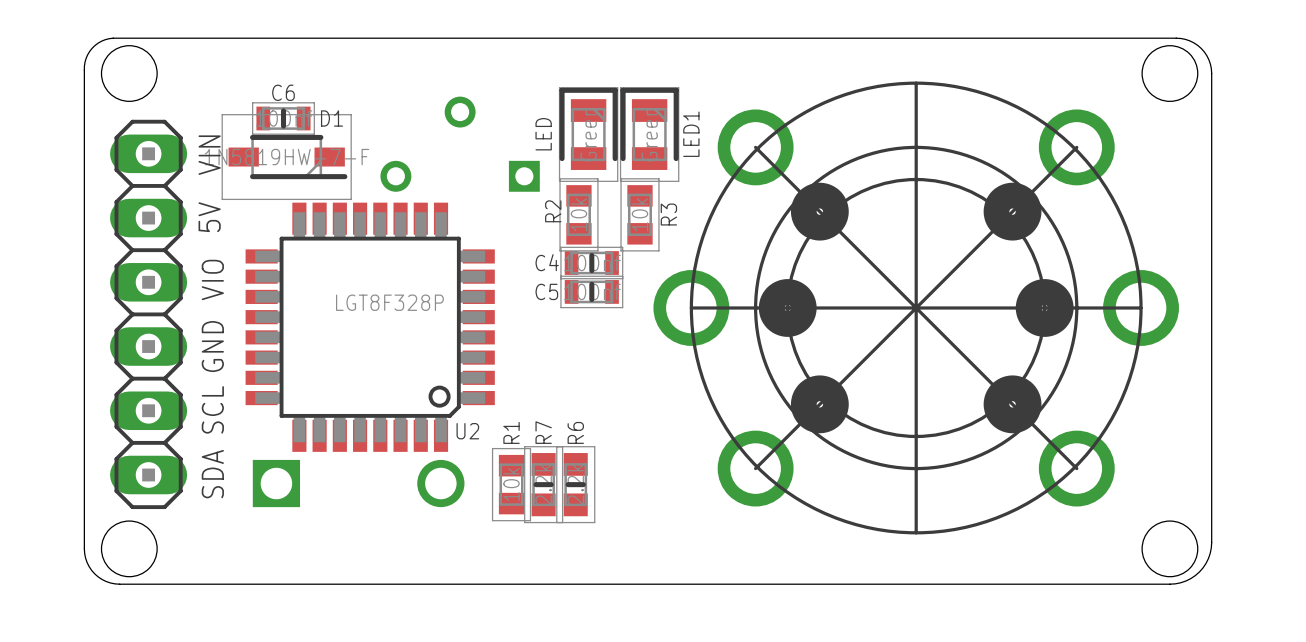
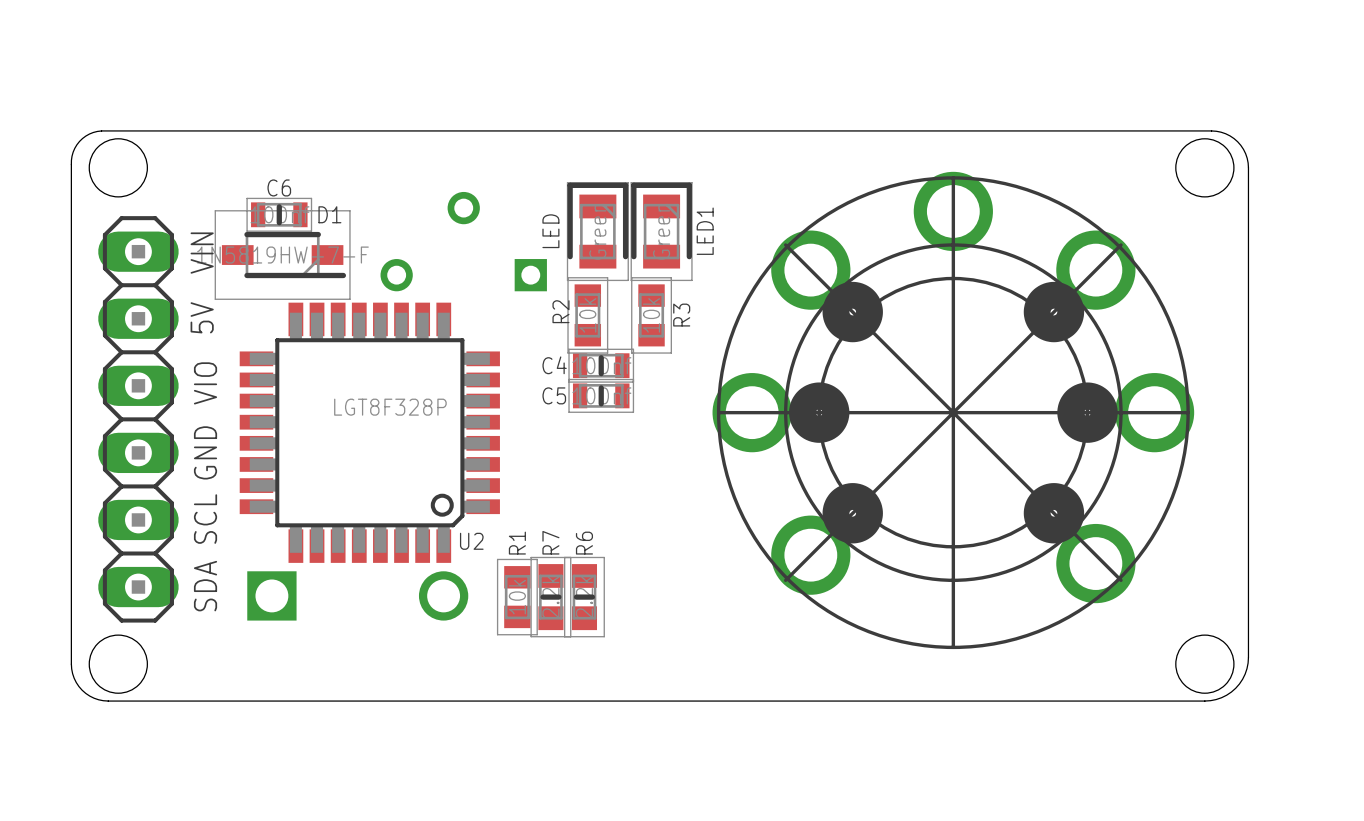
part footprint: [653, 81, 1179, 535] -> [712, 171, 1195, 650]

